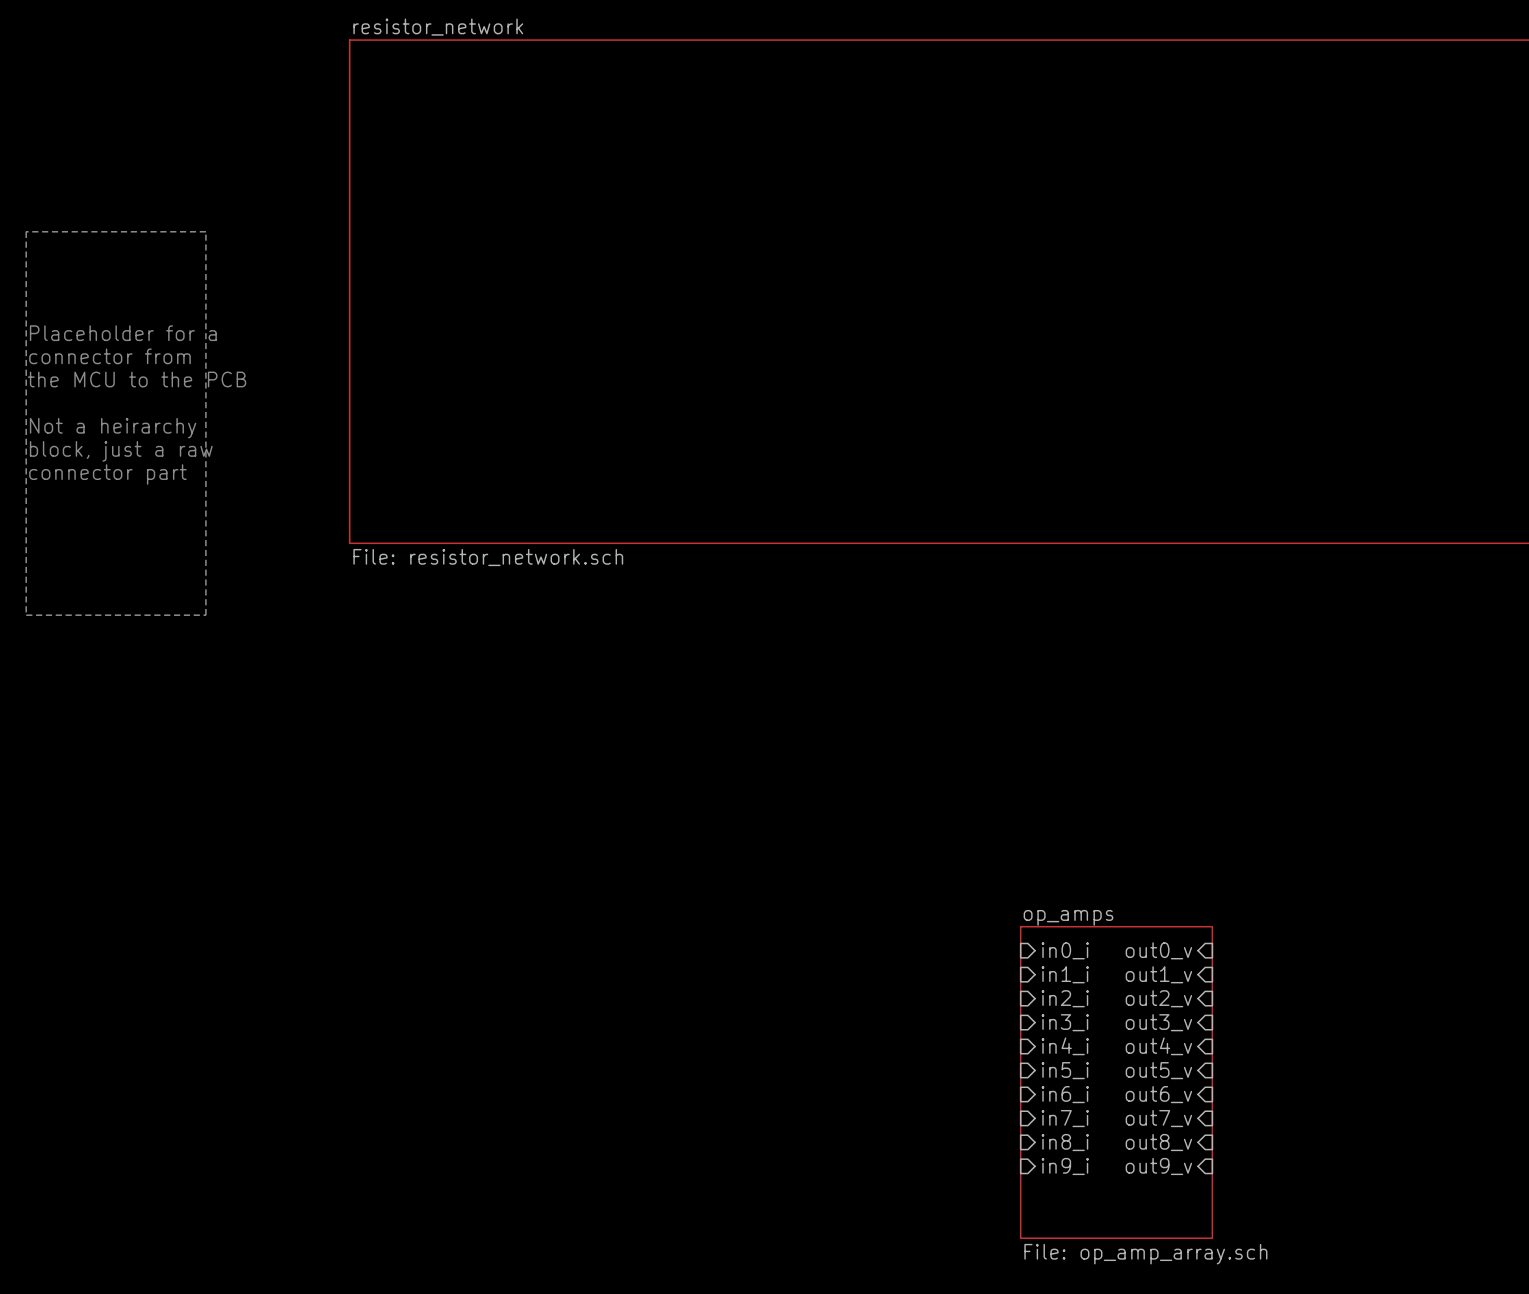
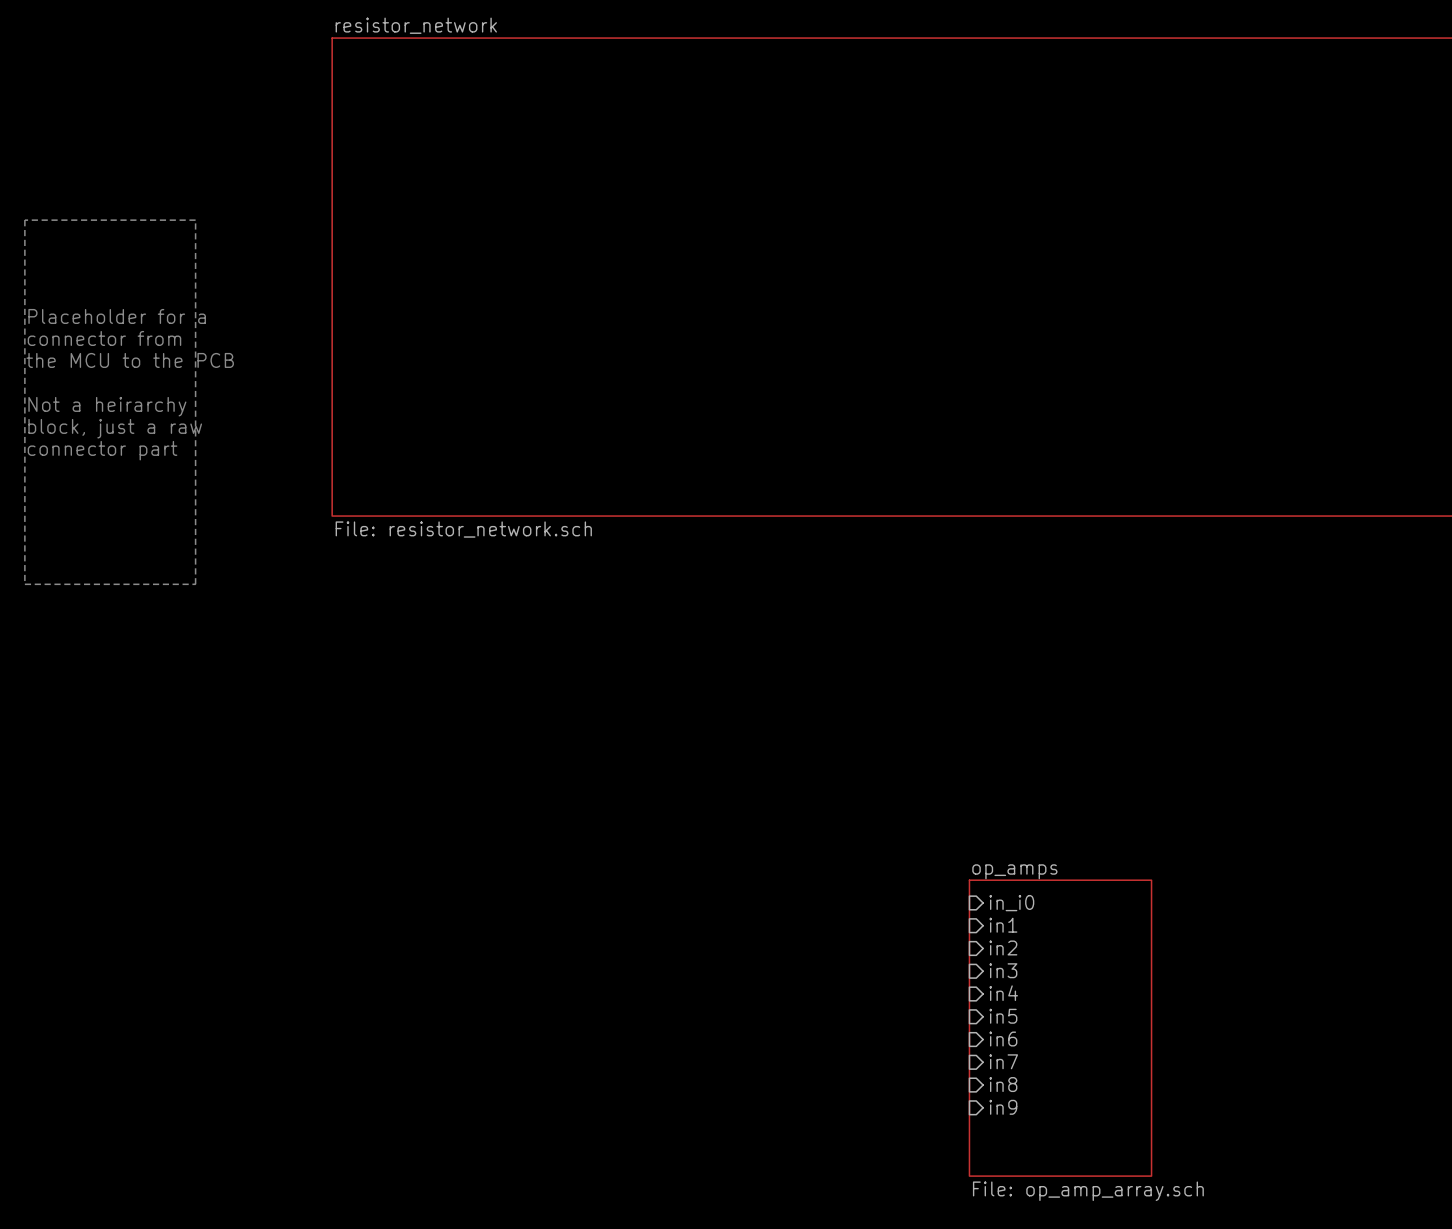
sheet pin: in0_i (1065, 950) -> in_i0 (1011, 903)
sheet pin: out0_v (1158, 950) -> none
sheet pin: in1_i (1065, 974) -> in1 (1003, 925)
sheet pin: out1_v (1158, 974) -> none
sheet pin: in2_i (1065, 998) -> in2 (1003, 947)
sheet pin: out2_v (1158, 998) -> none
sheet pin: in3_i (1065, 1022) -> in3 (1003, 970)
sheet pin: out3_v (1158, 1022) -> none
sheet pin: in4_i (1065, 1046) -> in4 (1003, 993)
sheet pin: out4_v (1158, 1046) -> none
sheet pin: in5_i (1065, 1070) -> in5 (1003, 1016)
sheet pin: out5_v (1158, 1070) -> none
sheet pin: in6_i (1065, 1094) -> in6 (1003, 1039)
sheet pin: out6_v (1158, 1094) -> none
sheet pin: in7_i (1065, 1118) -> in7 (1003, 1061)
sheet pin: out7_v (1158, 1118) -> none
sheet pin: in8_i (1065, 1142) -> in8 (1003, 1084)
sheet pin: out8_v (1158, 1142) -> none
sheet pin: in9_i (1065, 1166) -> in9 (1003, 1107)
sheet pin: out9_v (1158, 1166) -> none

